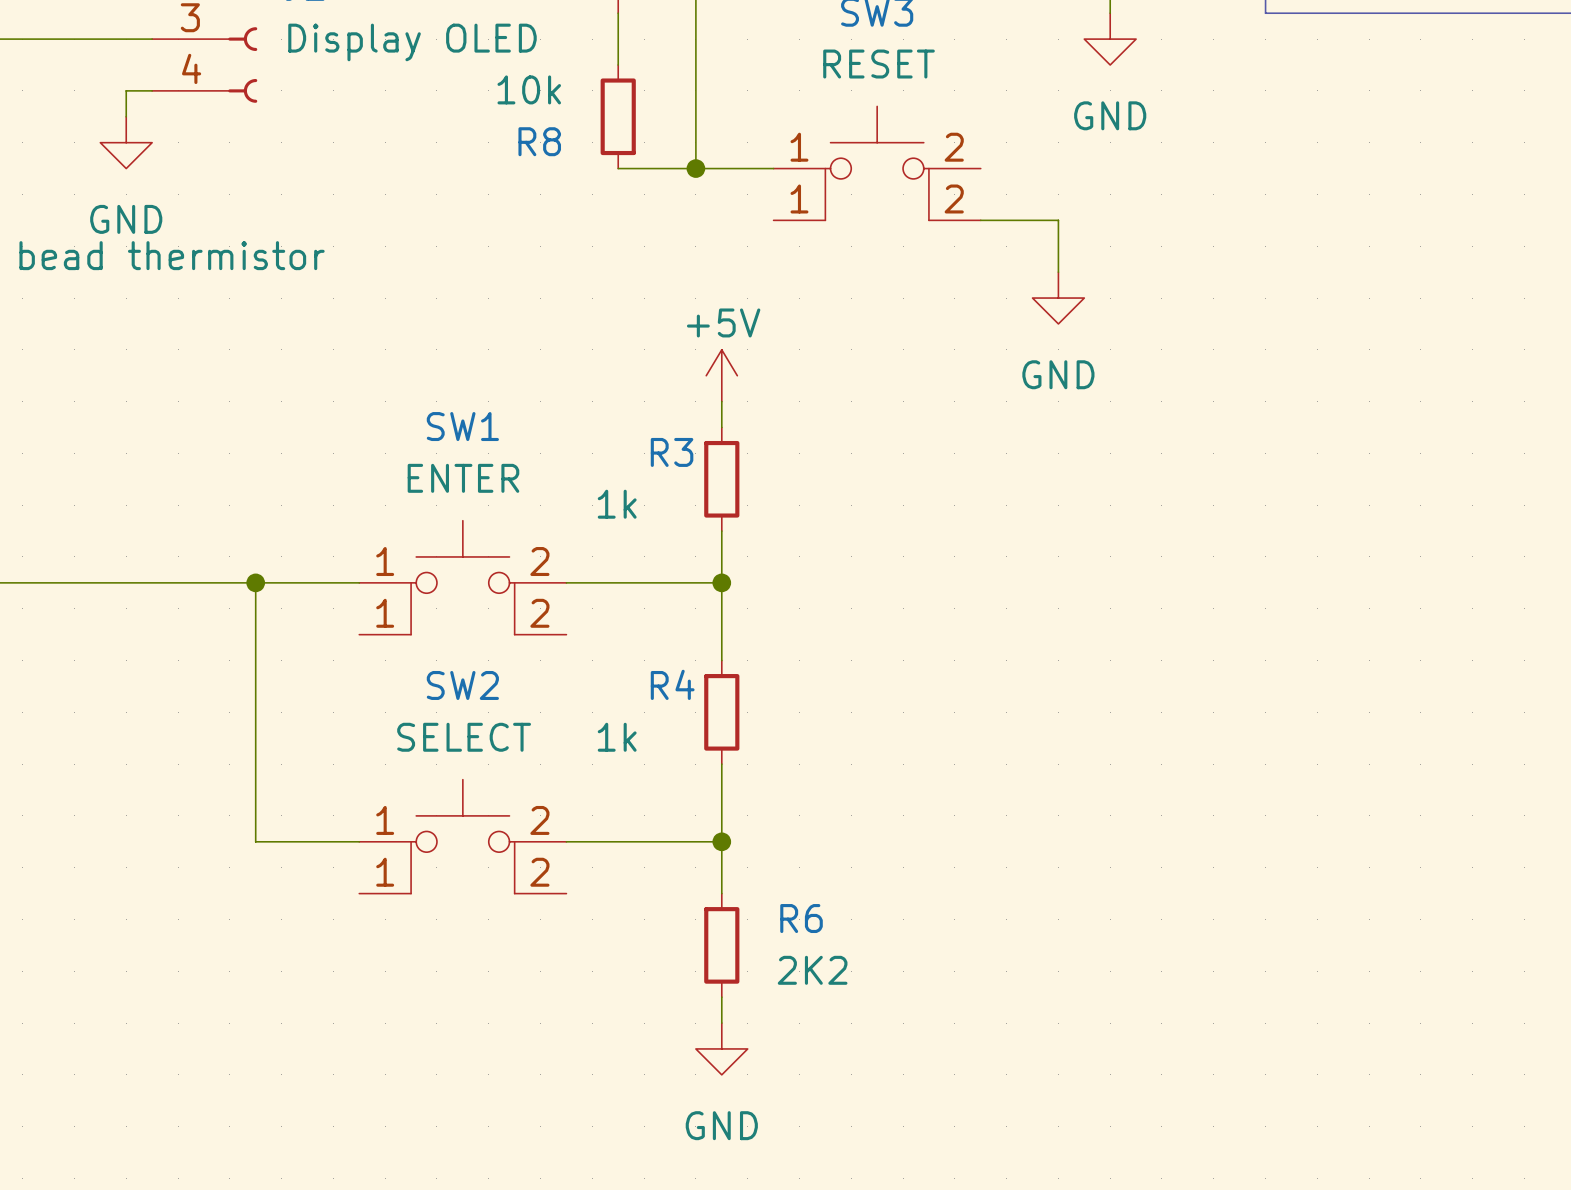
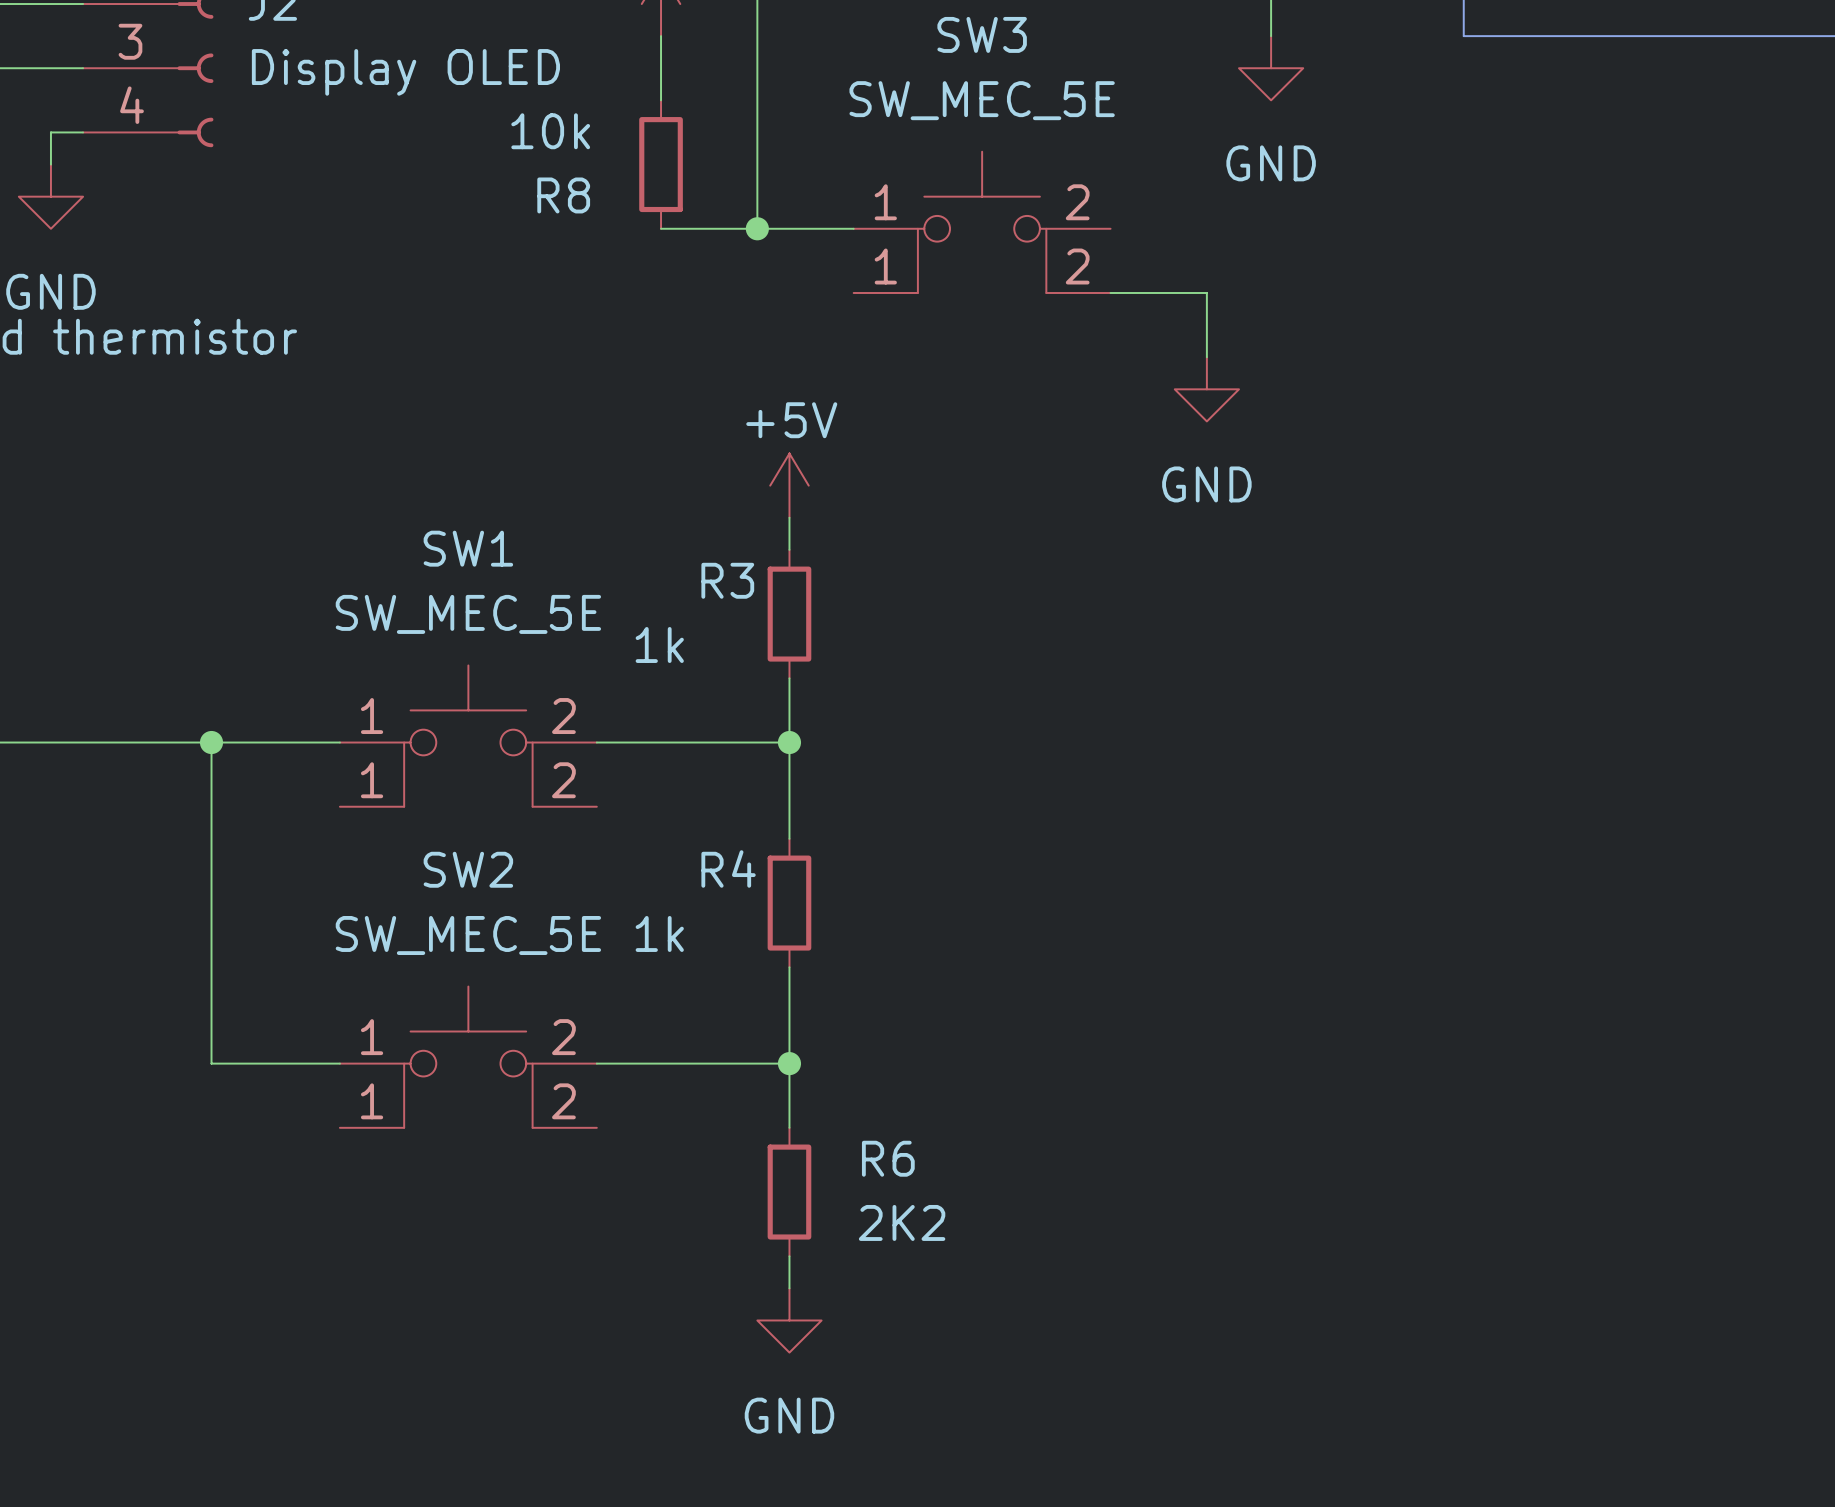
SW3 value: RESET (879, 64) -> SW_MEC_5E (982, 100)
SW1 value: ENTER (463, 478) -> SW_MEC_5E (468, 614)
SW2 value: SELECT (464, 737) -> SW_MEC_5E (468, 935)

